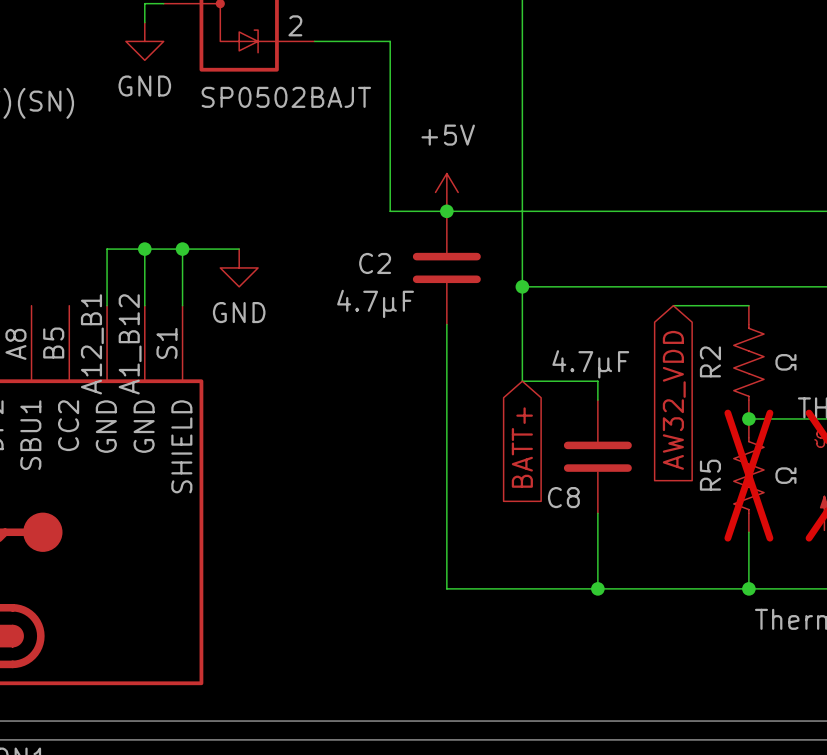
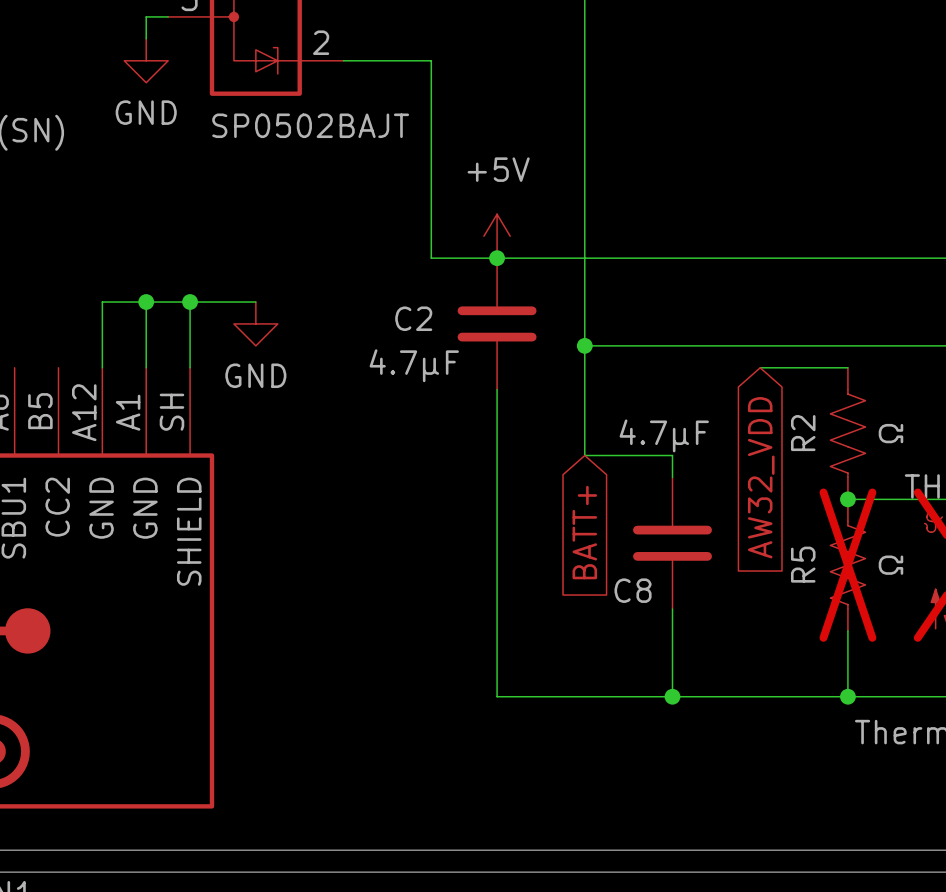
part pin number: S1 (166, 343) -> SH (171, 412)
part pin number: A12_B1 (92, 344) -> A12 (84, 412)
part pin number: A1_B12 (130, 344) -> A1 (128, 412)

